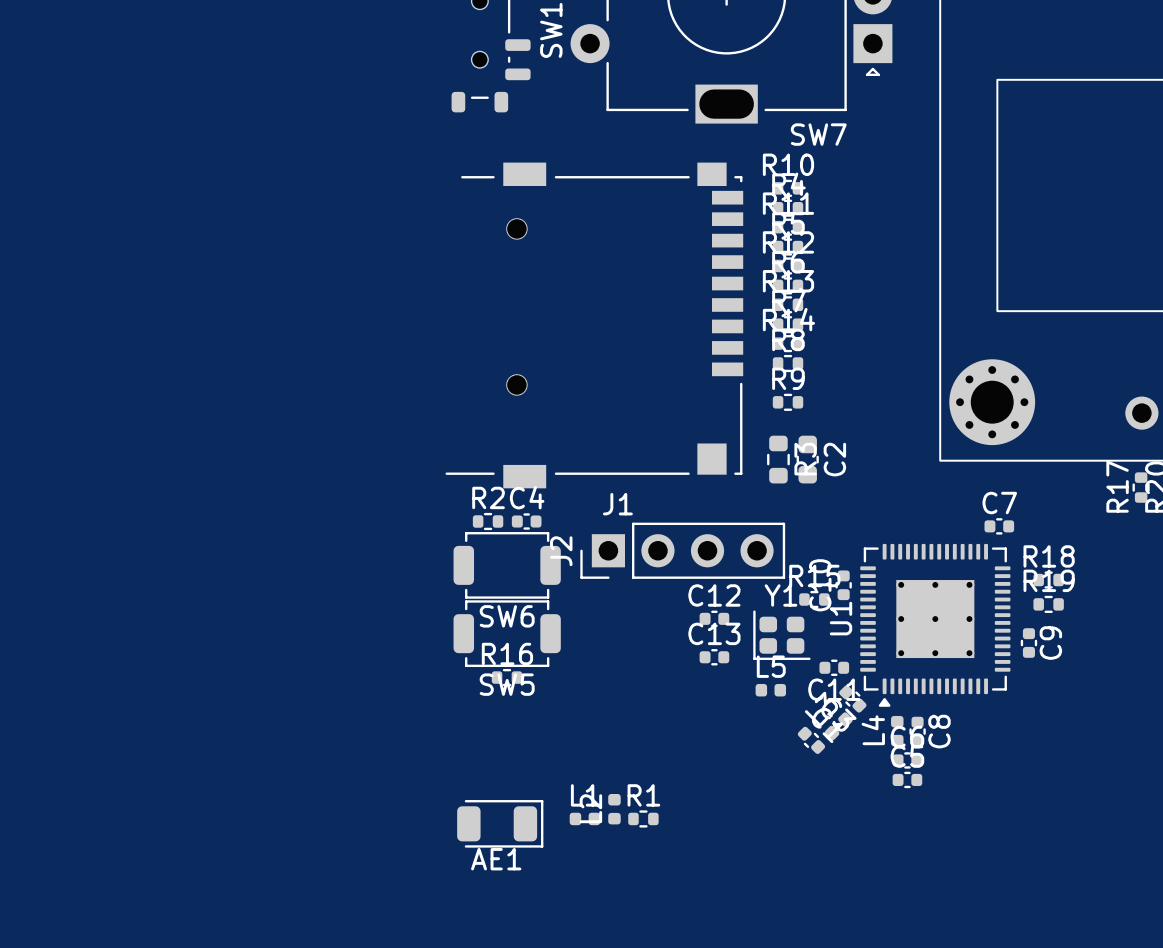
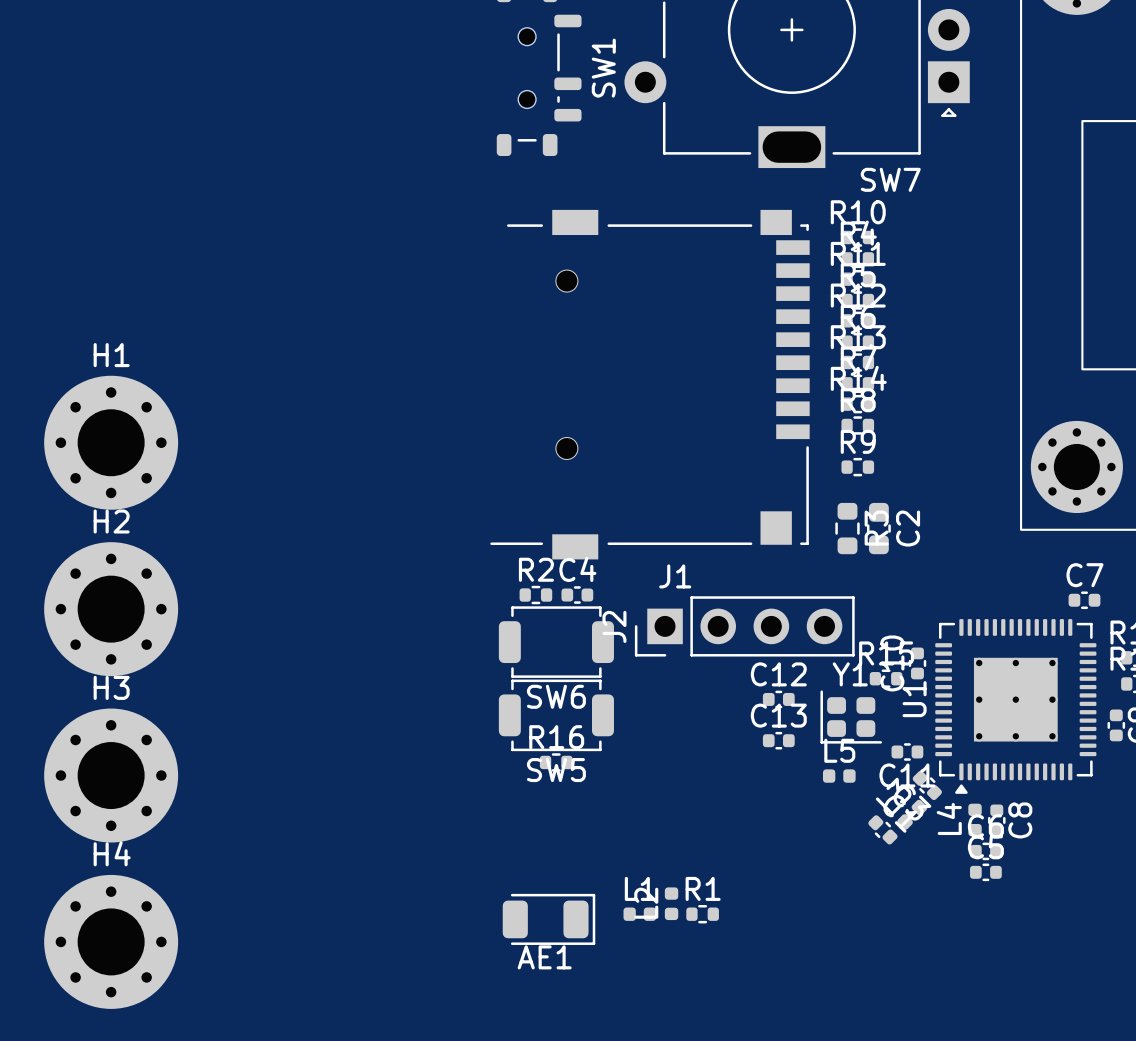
H1: none -> (111, 442)
H2: none -> (111, 609)
H3: none -> (111, 775)
H4: none -> (111, 941)

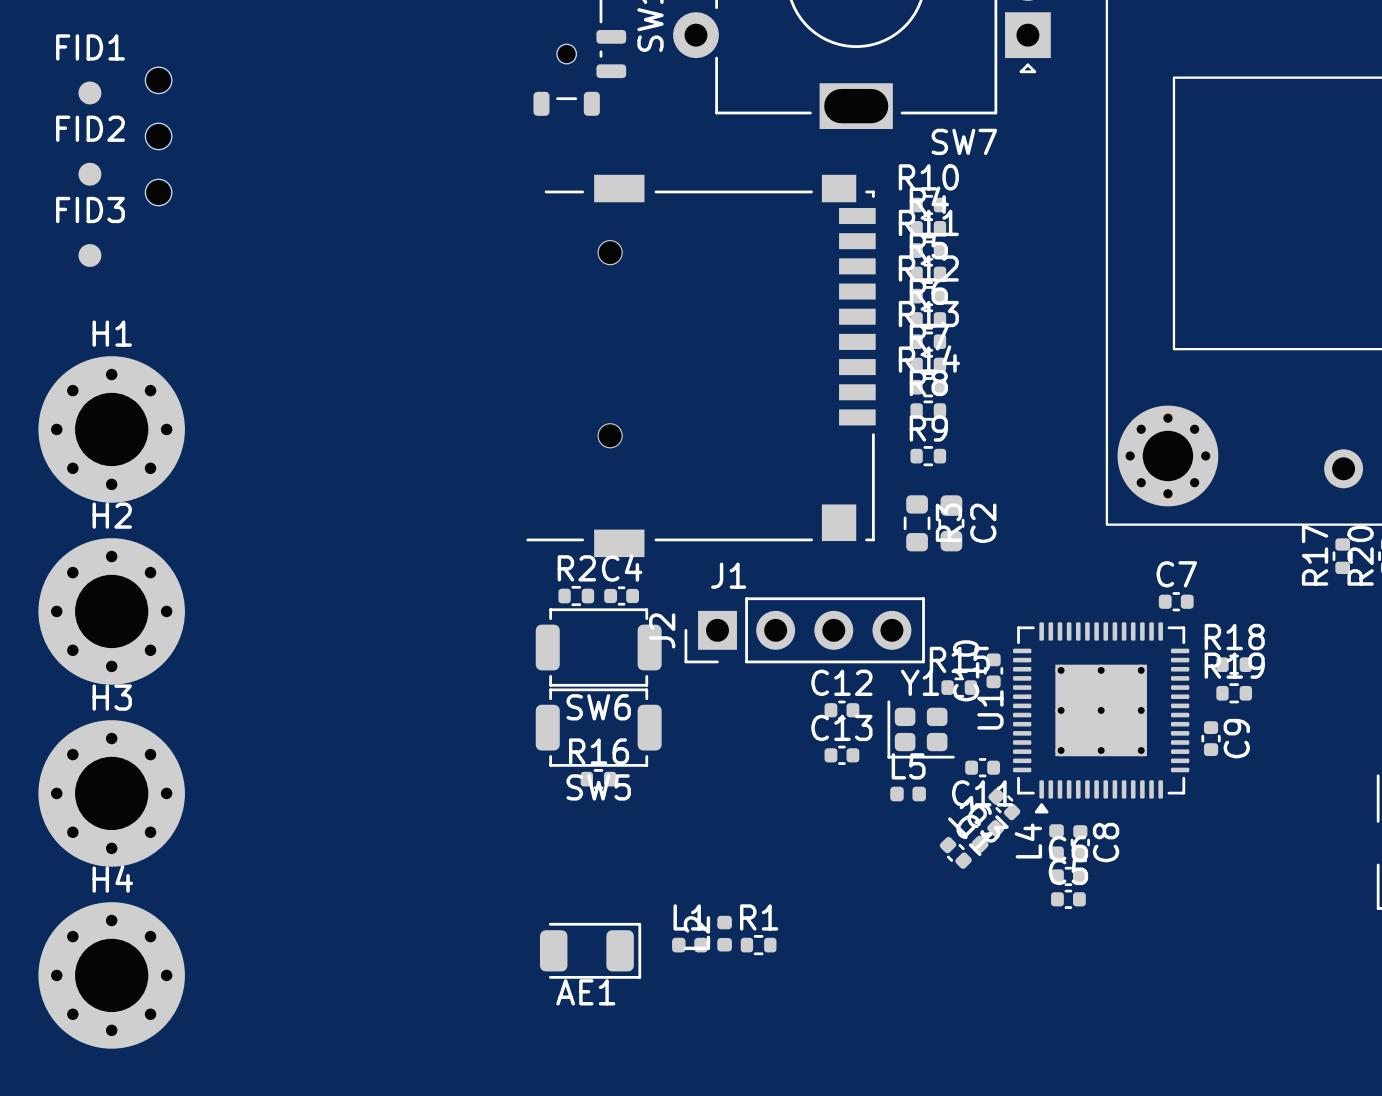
part: none -> (158, 80)
FID1: none -> (89, 92)
part: none -> (158, 136)
FID2: none -> (89, 174)
part: none -> (158, 192)
FID3: none -> (89, 255)

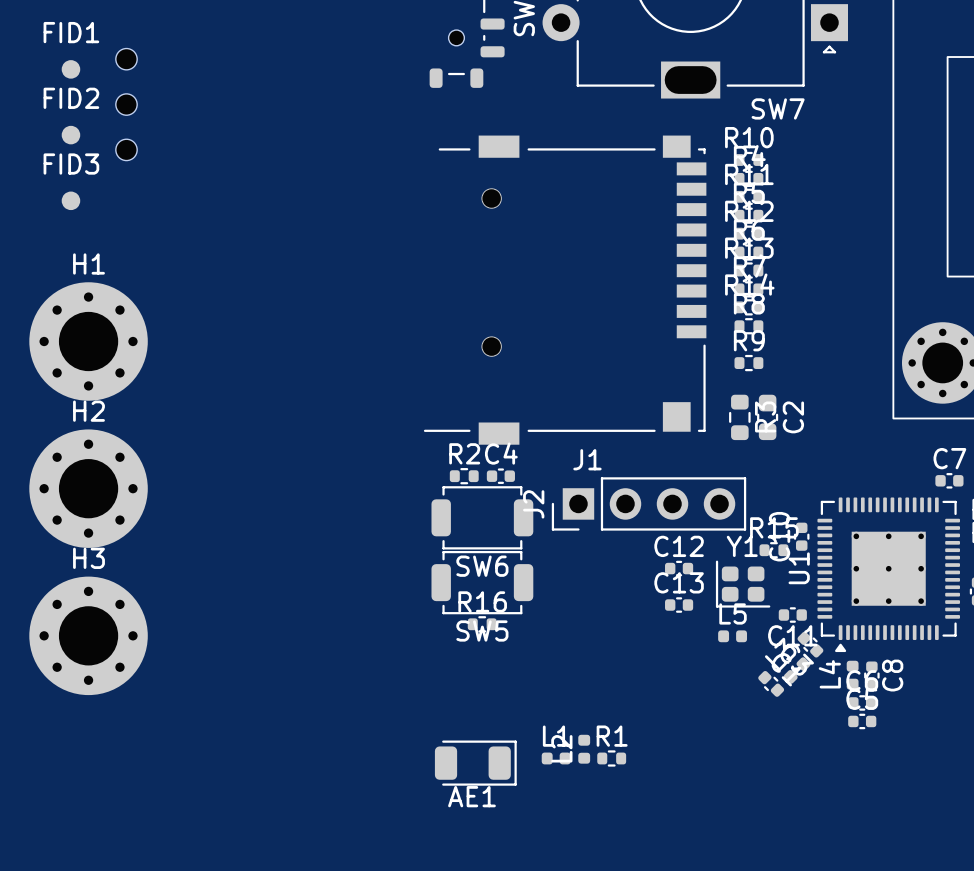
H4: (111, 975) -> none

